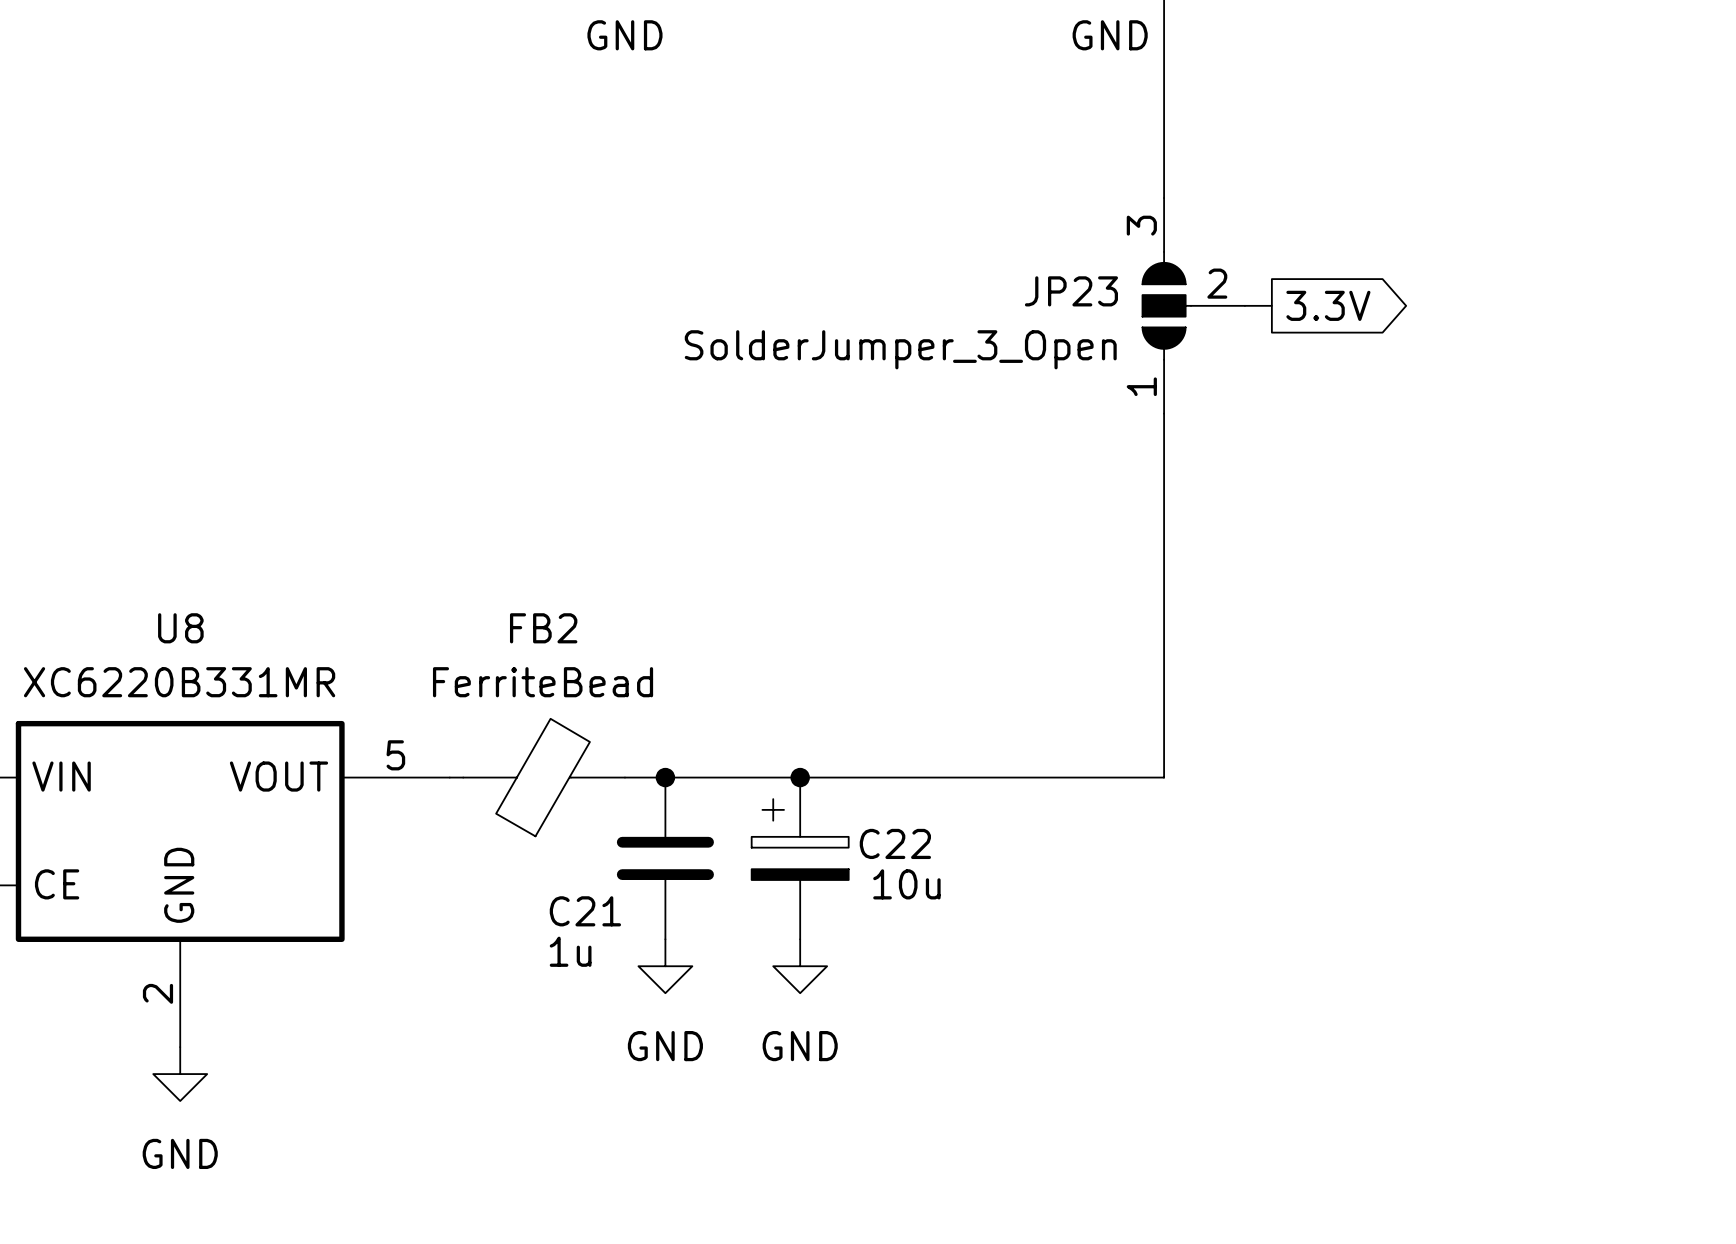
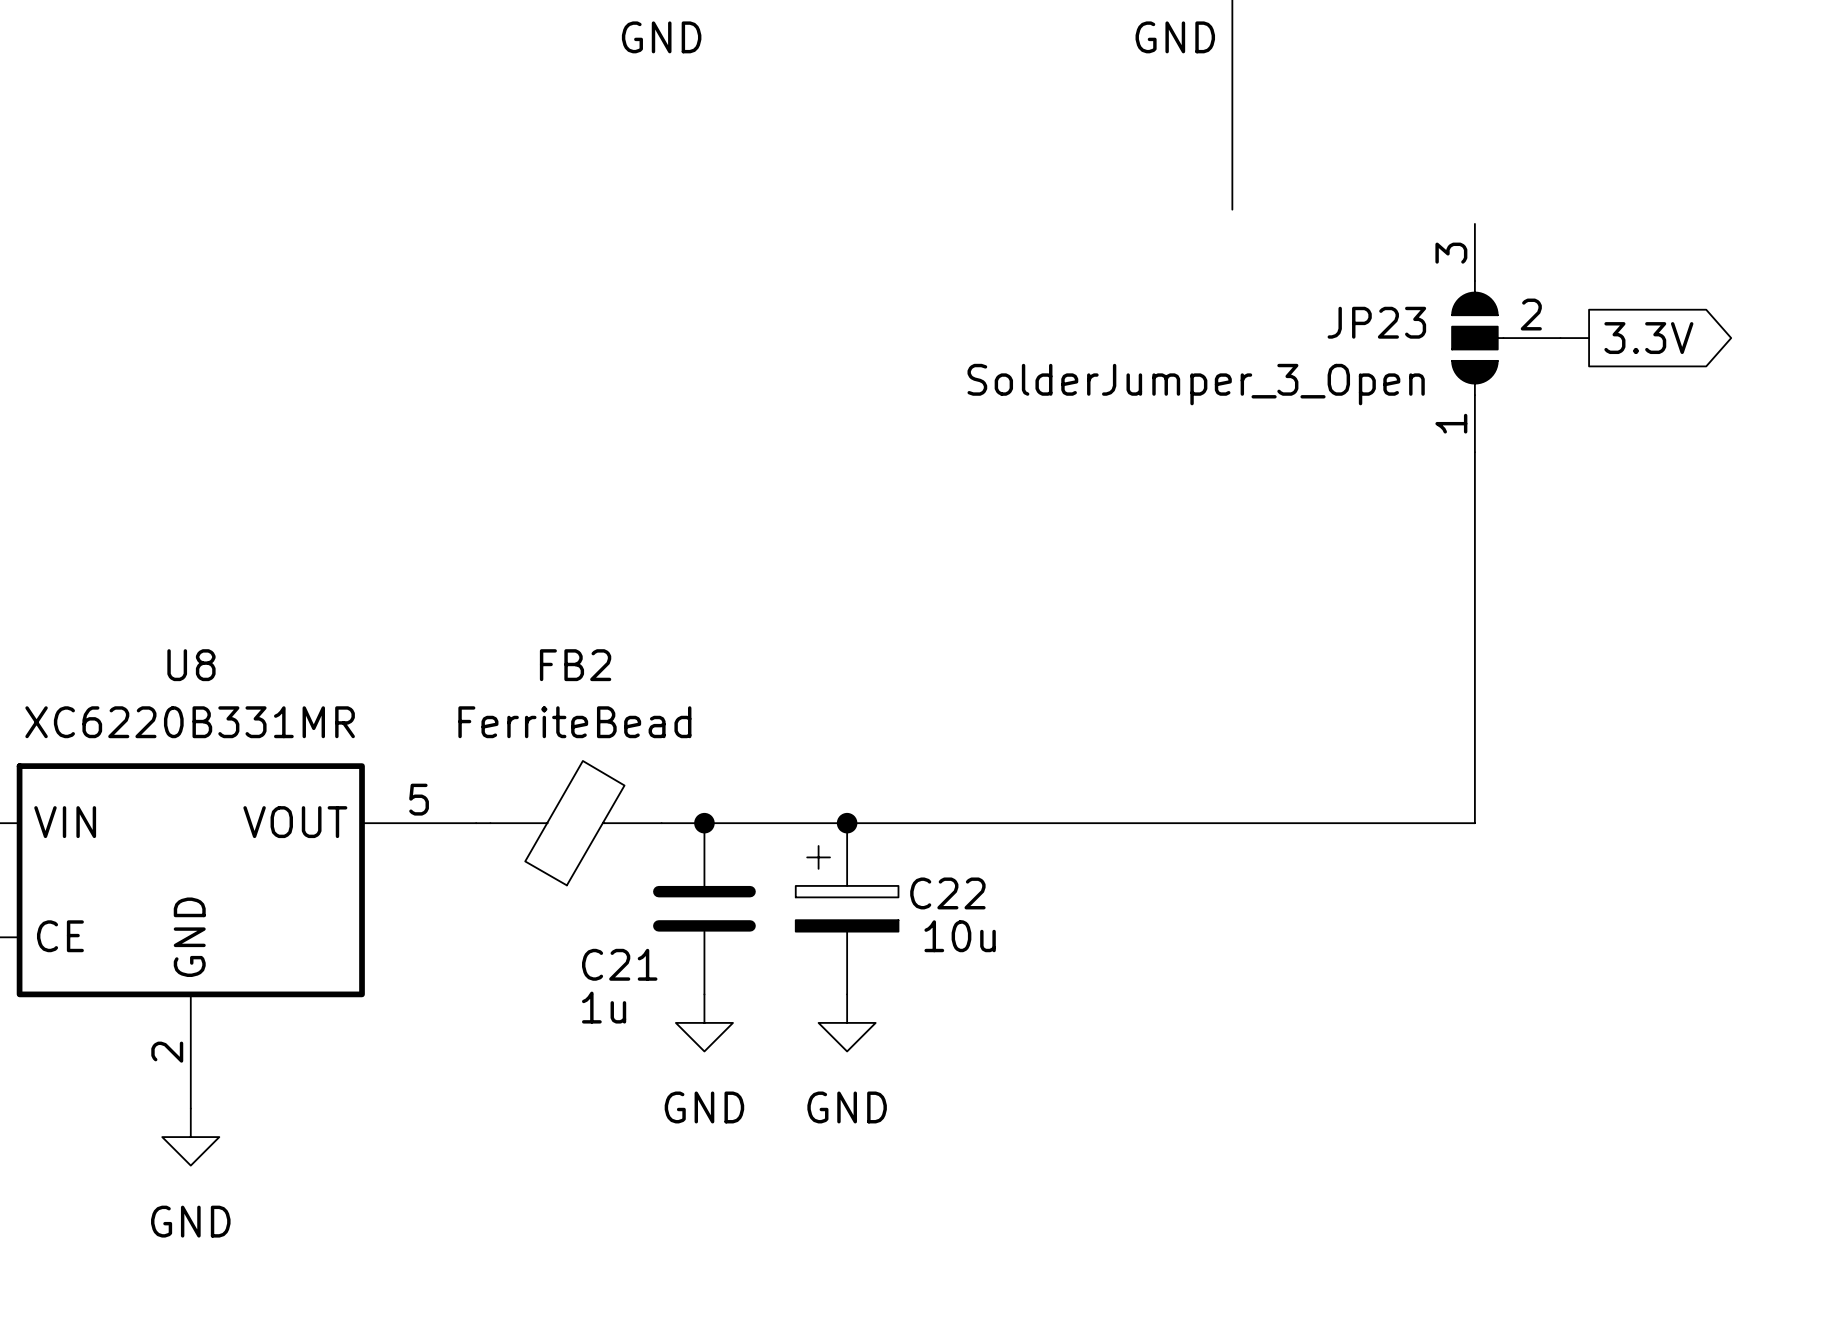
JP23 position: (1193, 305) -> (1506, 338)
wire: (1244, 305) (1271, 305) -> (1560, 338) (1589, 338)
global label position: 3.3V (1328, 305) -> 3.3V (1648, 338)
wire: (1164, 413) (1164, 777) -> (1474, 452) (1474, 823) (1232, 823)

